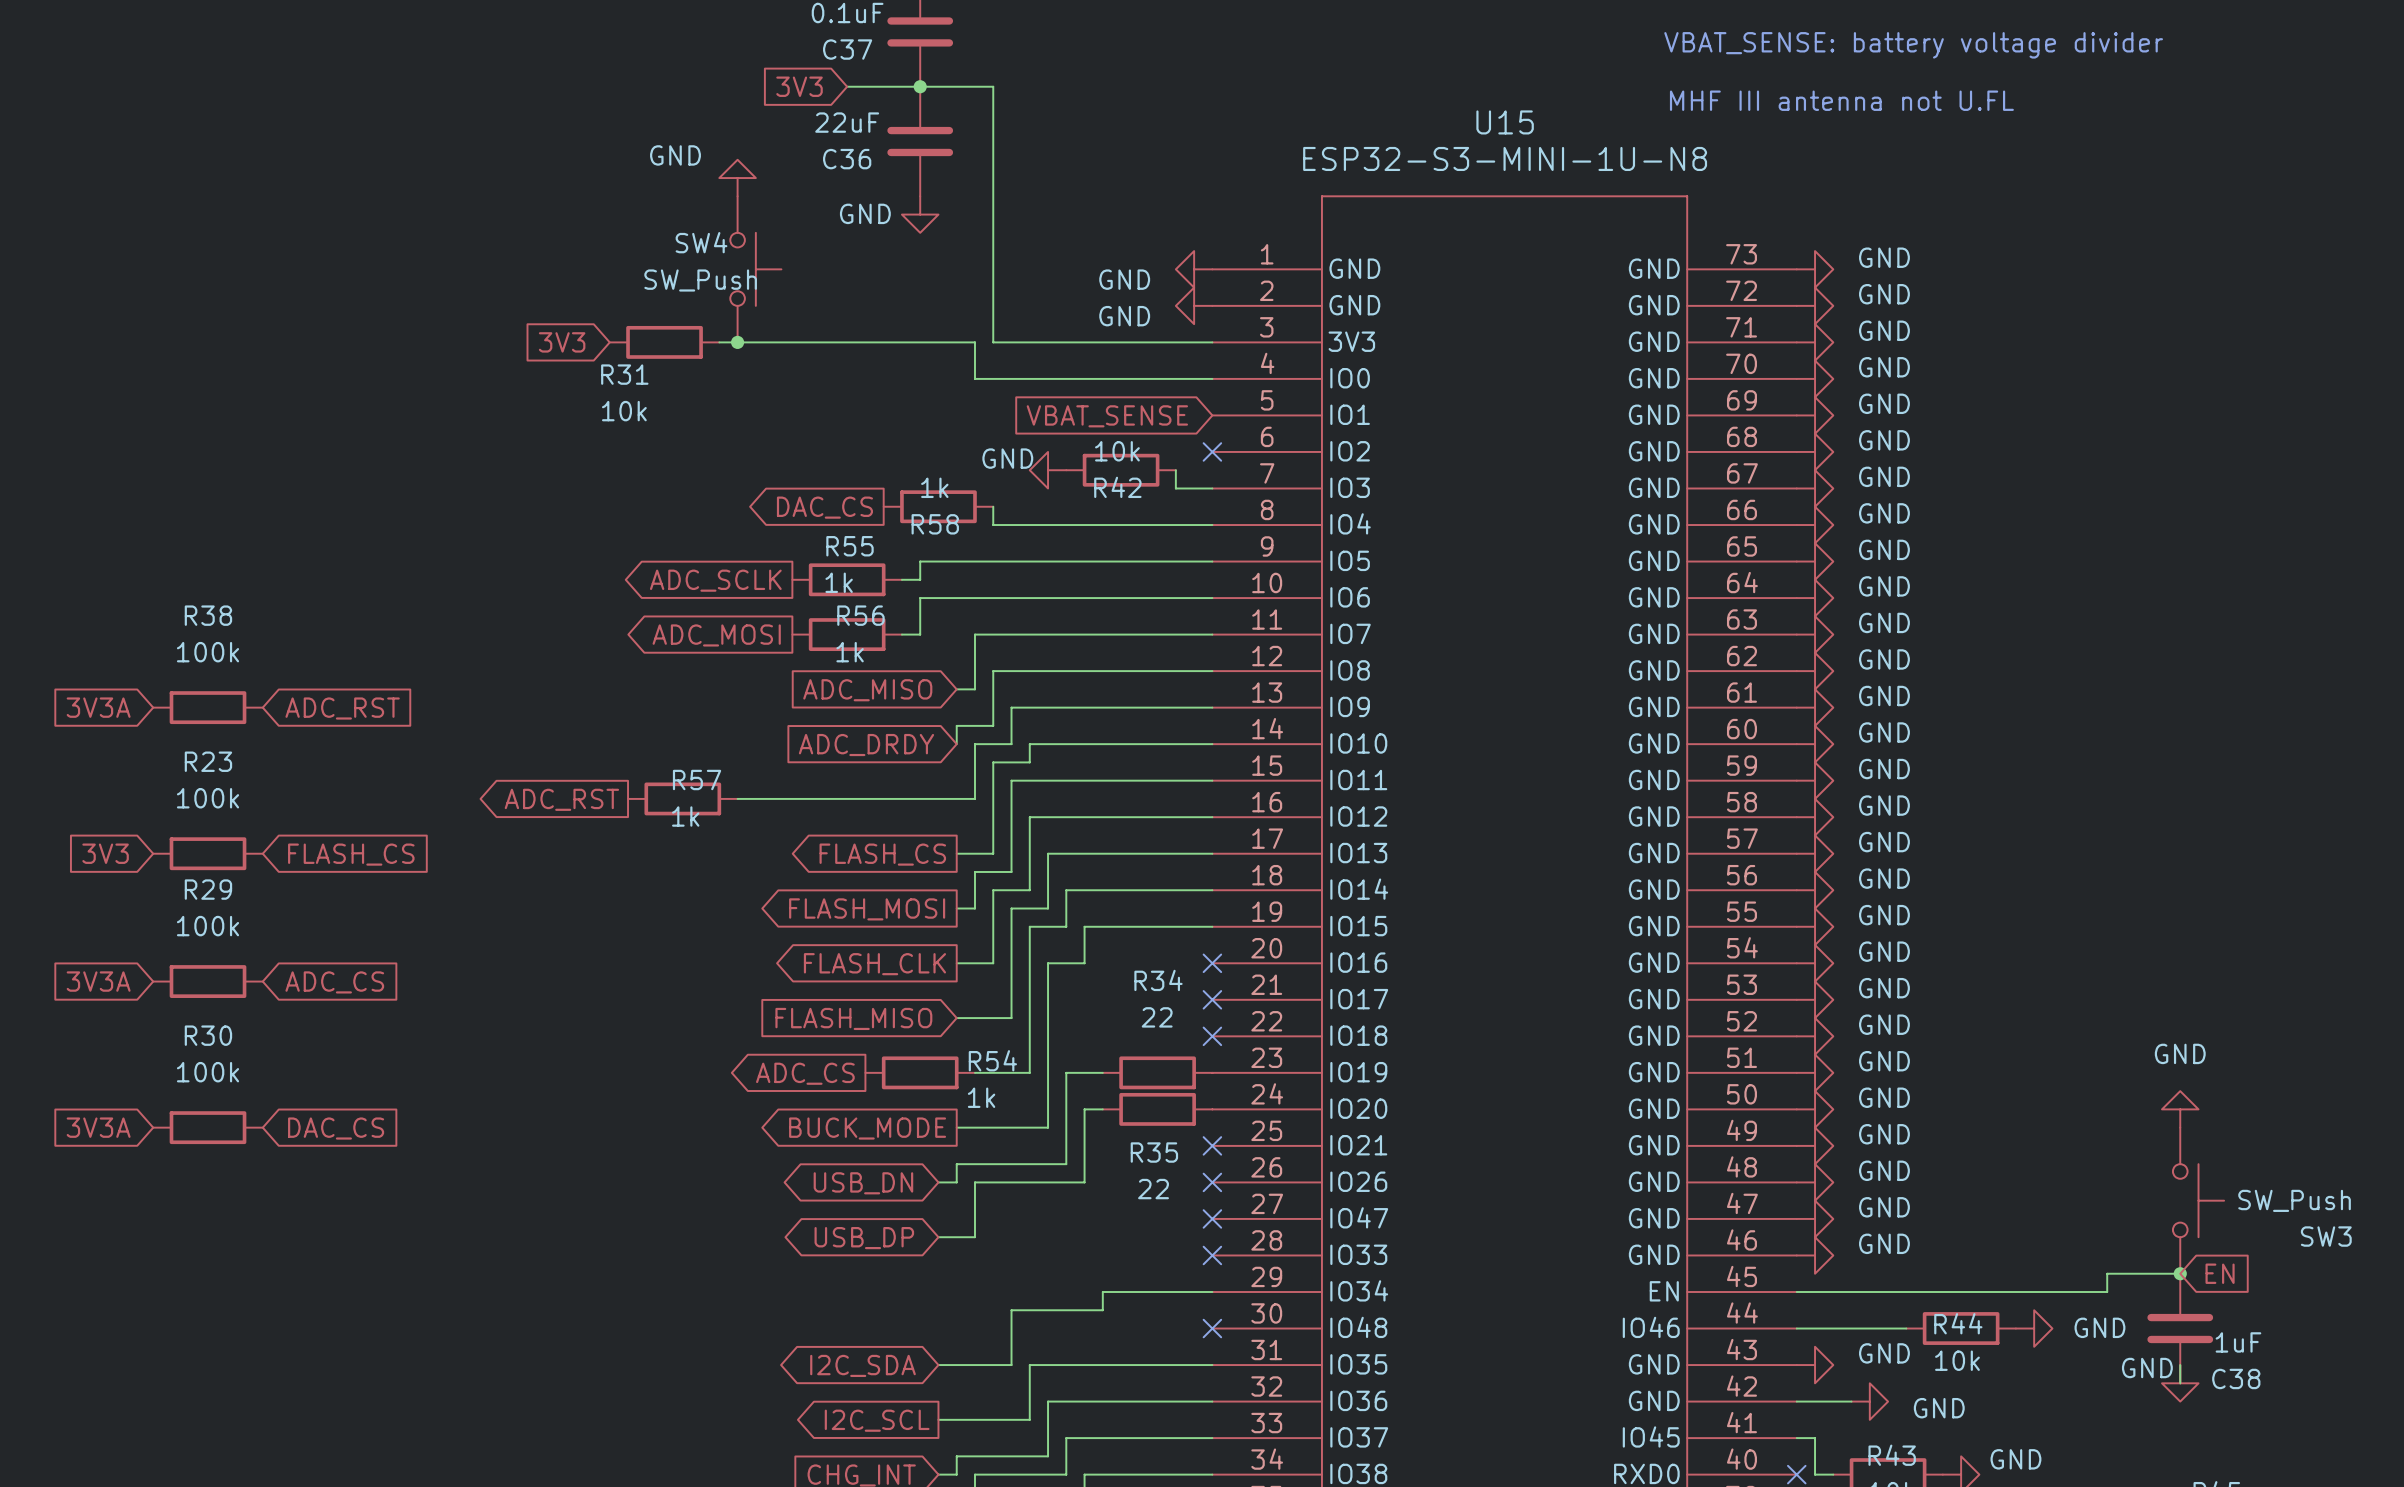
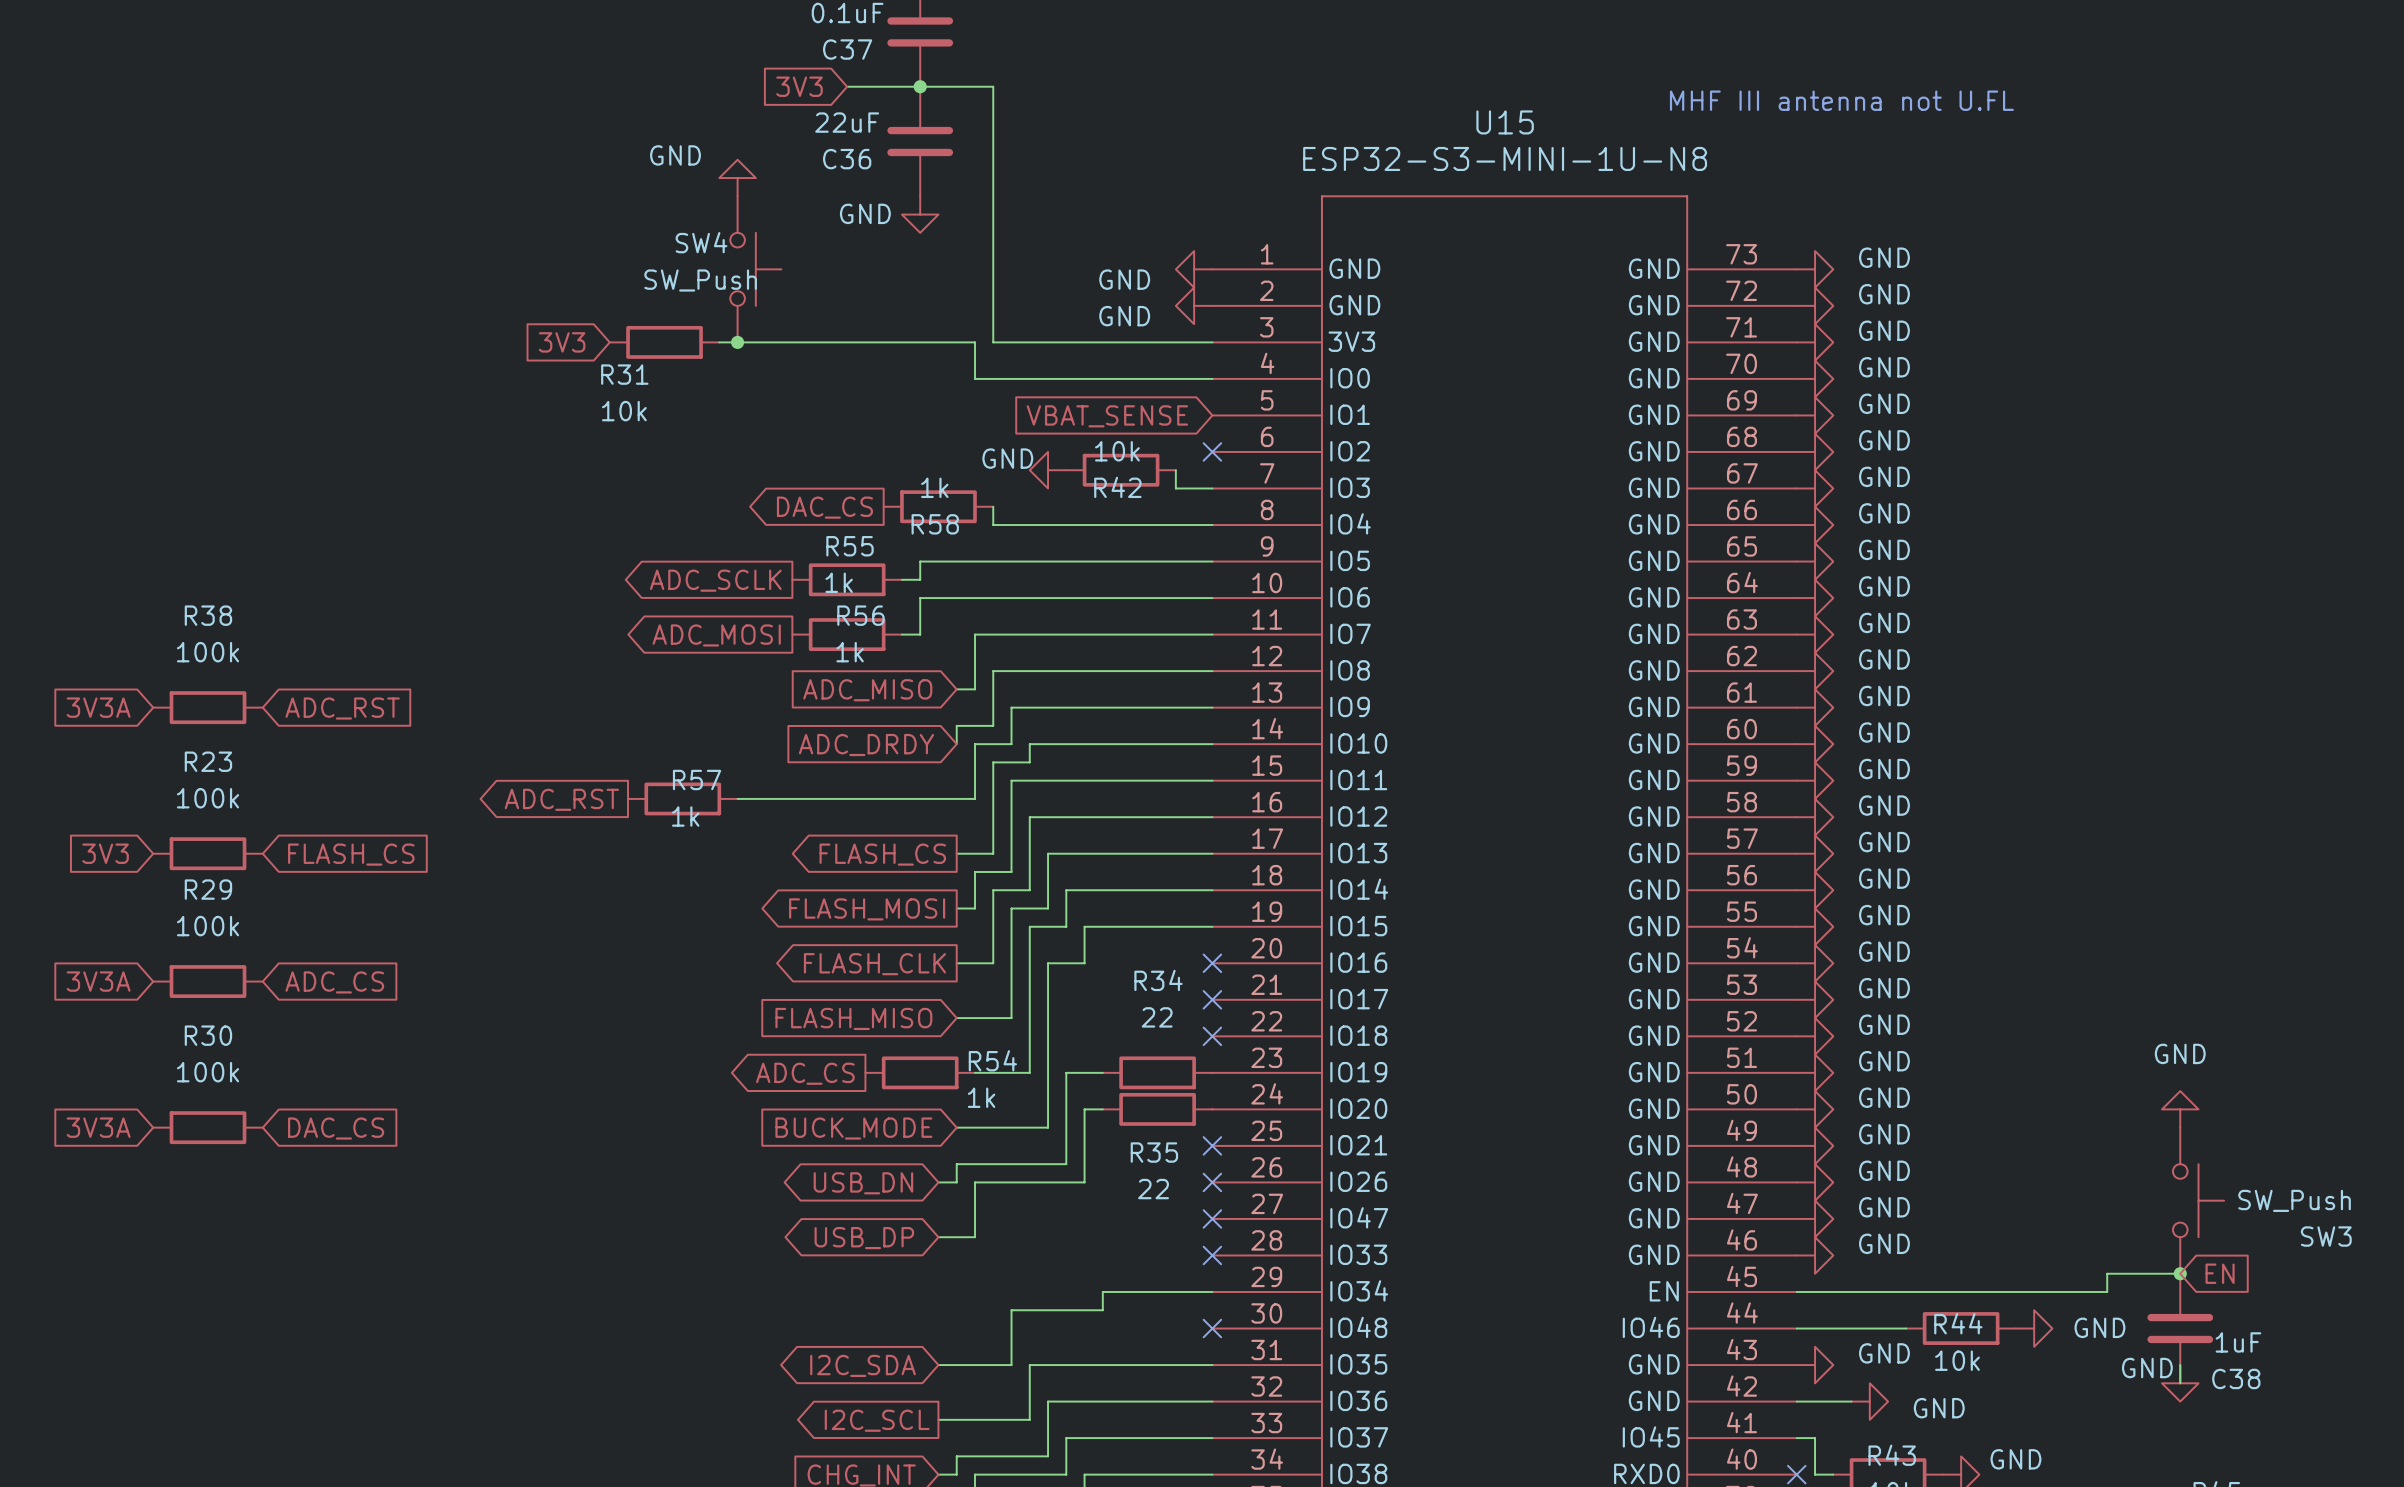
text: VBAT_SENSE: battery voltage divider (1913, 45) -> none
global label shape: output (867, 1128) -> input (853, 1128)

